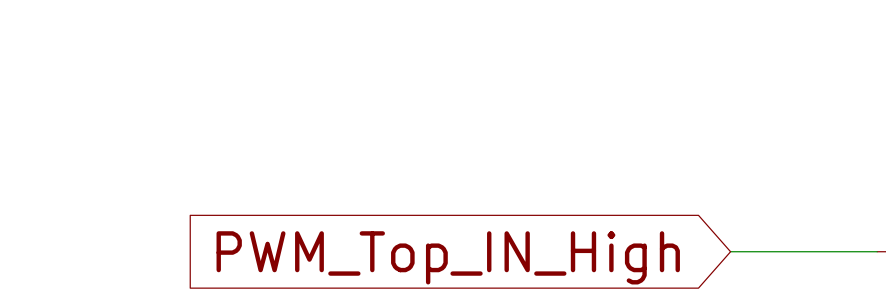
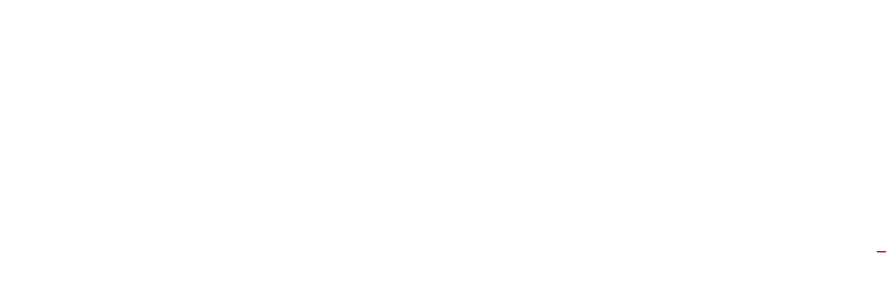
wire: (730, 251) (877, 251) -> none
global label: PWM_Top_IN_High (448, 257) -> none

